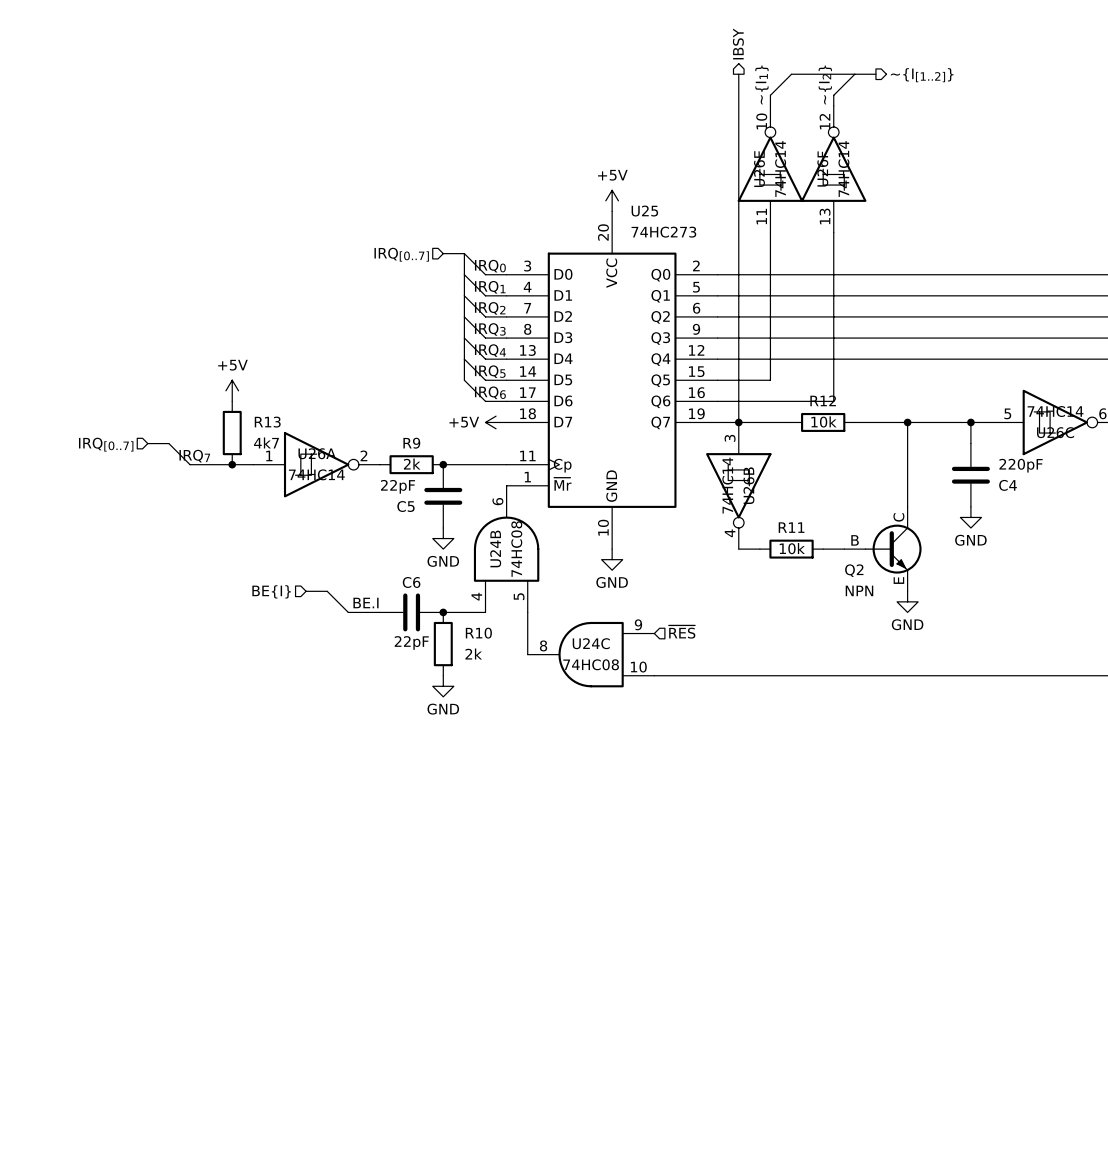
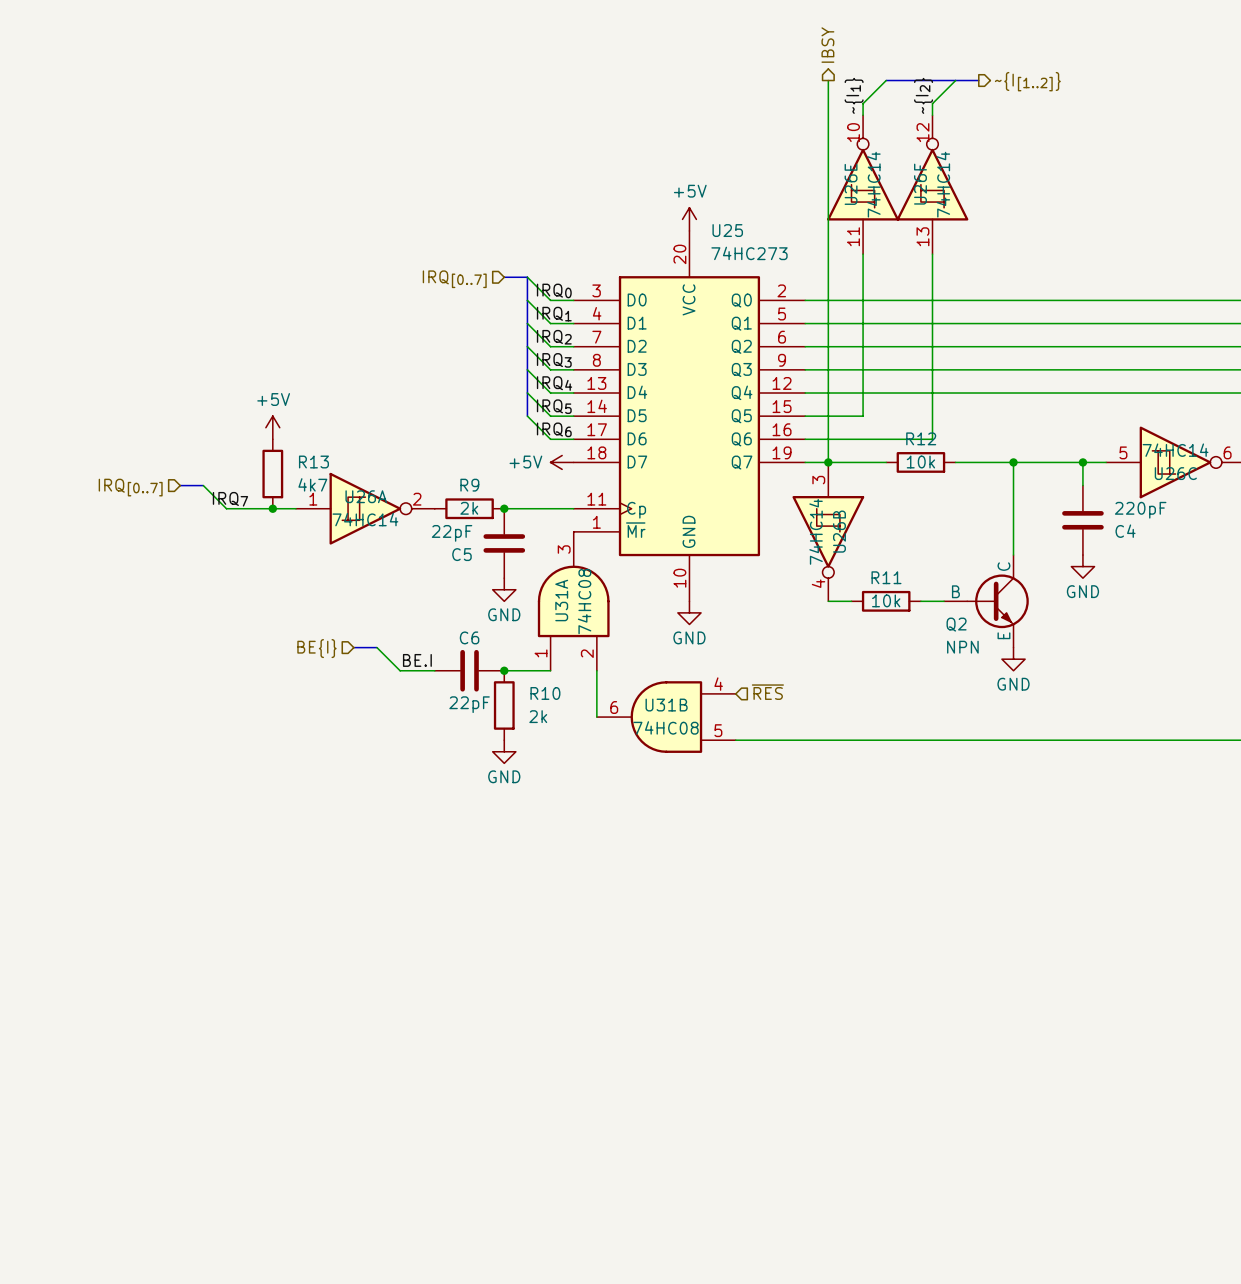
U24B pin number: 6 (497, 501) -> 3 (564, 549)
U24B name: U24B (495, 548) -> U31A (561, 600)
U24B pin number: 4 (476, 596) -> 1 (541, 653)
U24B pin number: 5 (519, 596) -> 2 (587, 653)
U24C pin number: 9 (638, 624) -> 4 (718, 684)
U24C name: U24C (591, 643) -> U31B (666, 705)
U24C pin number: 8 (543, 645) -> 6 (614, 707)
U24C pin number: 10 (638, 667) -> 5 (718, 730)

